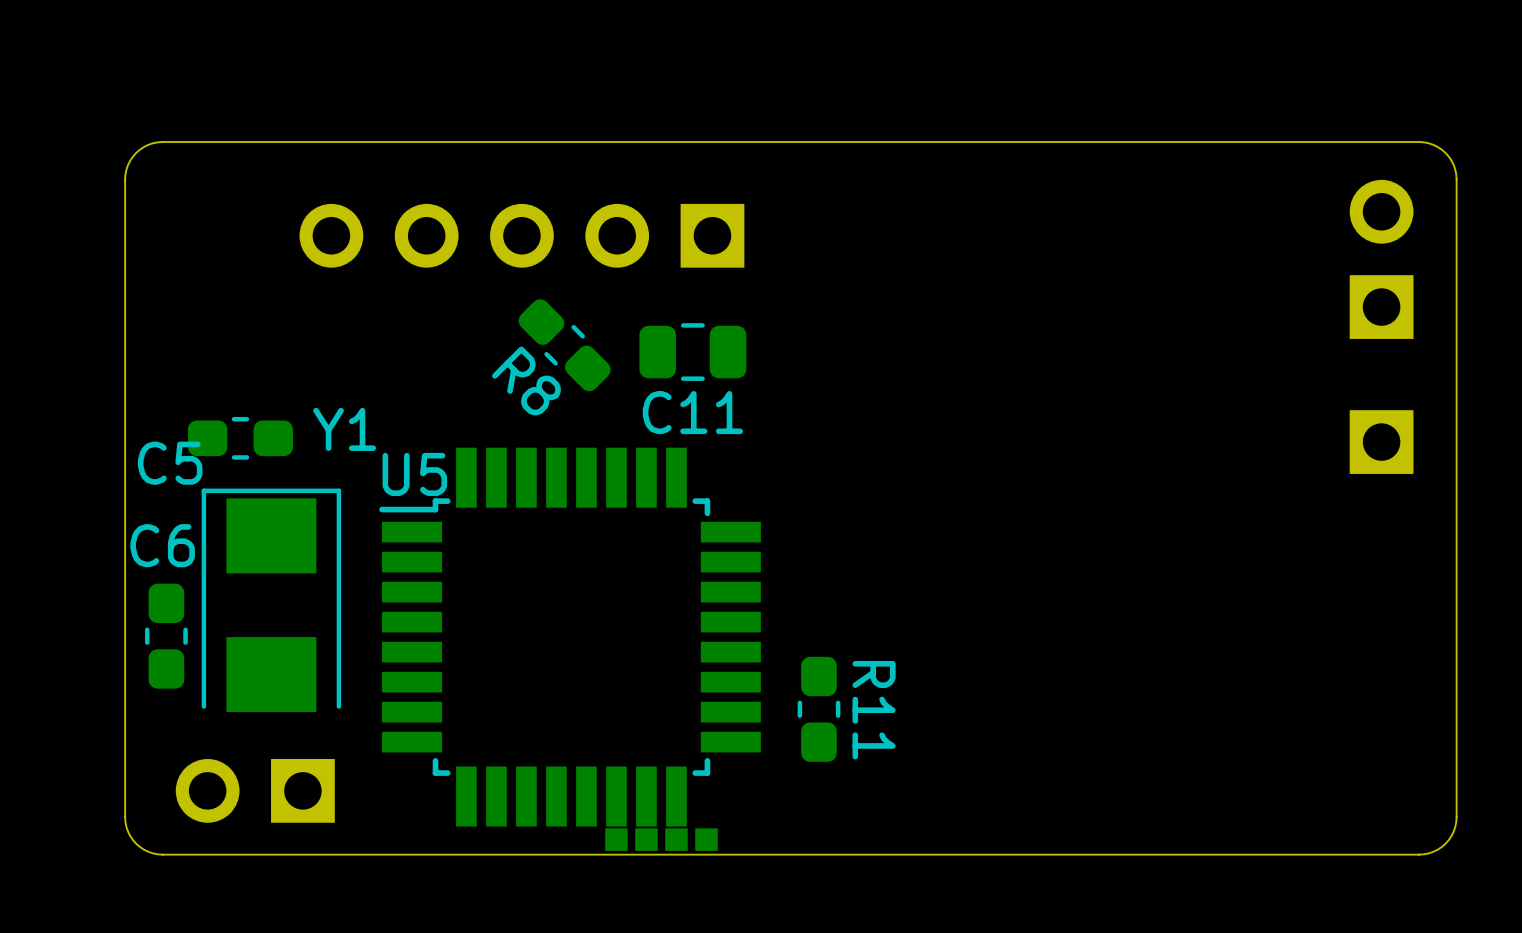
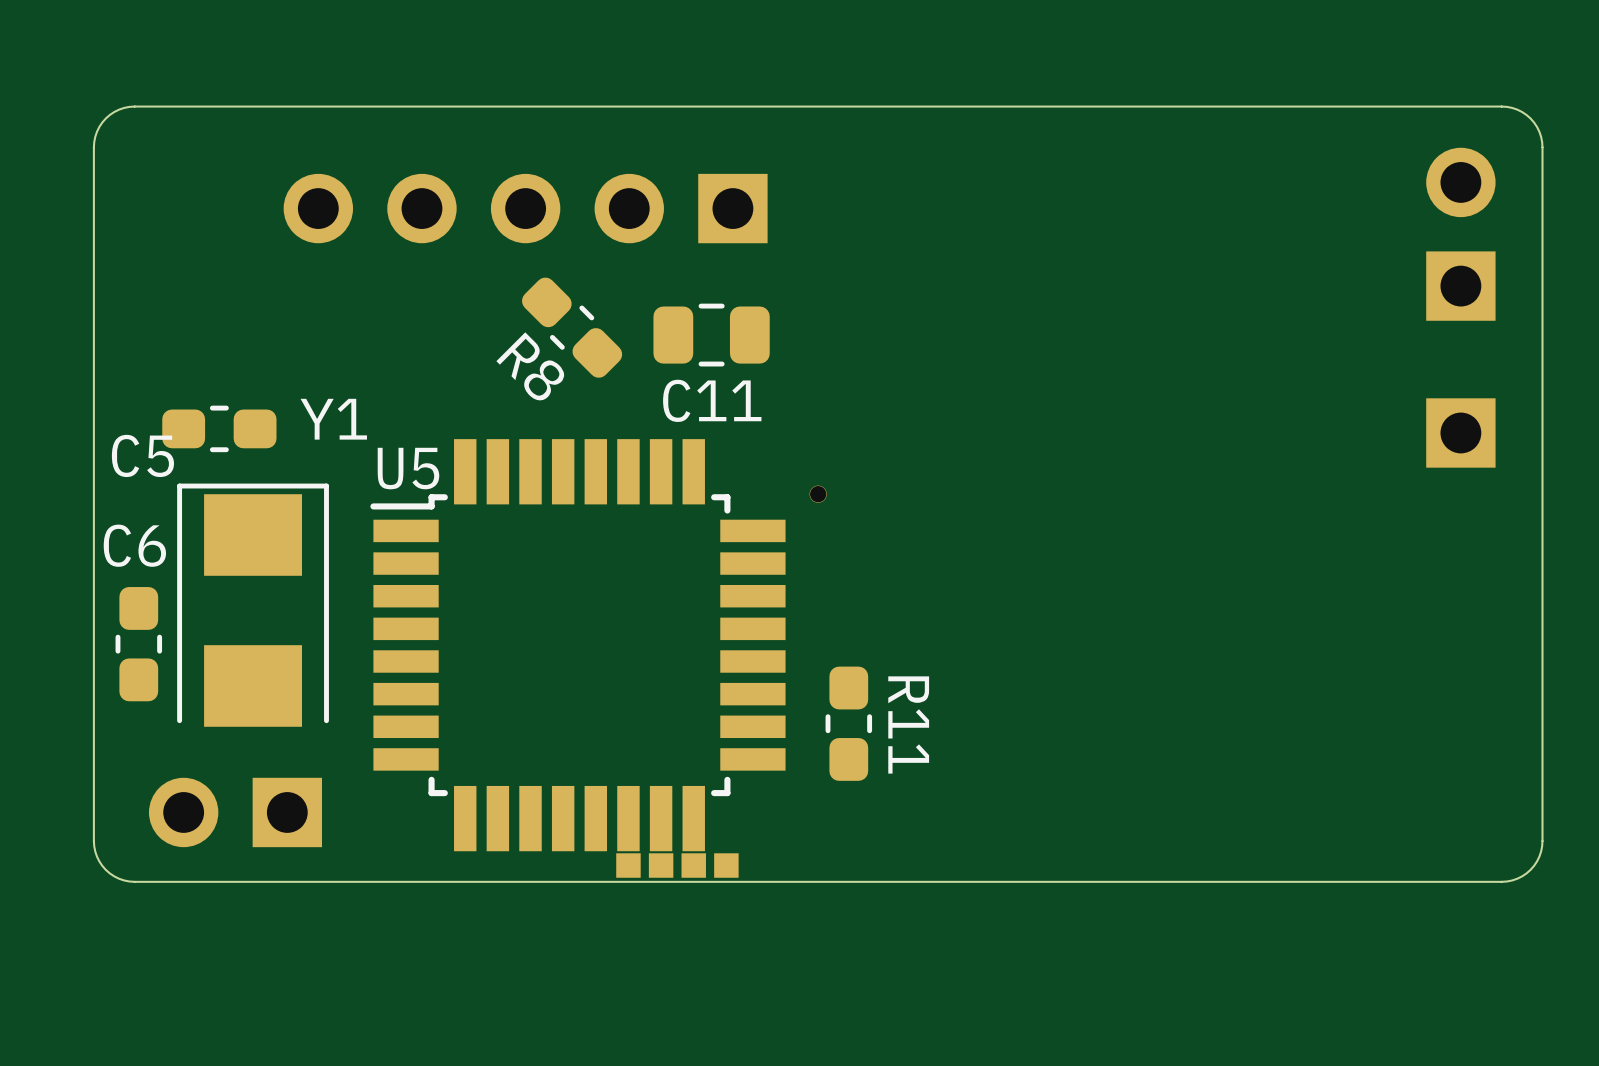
part: none -> (818, 494)

